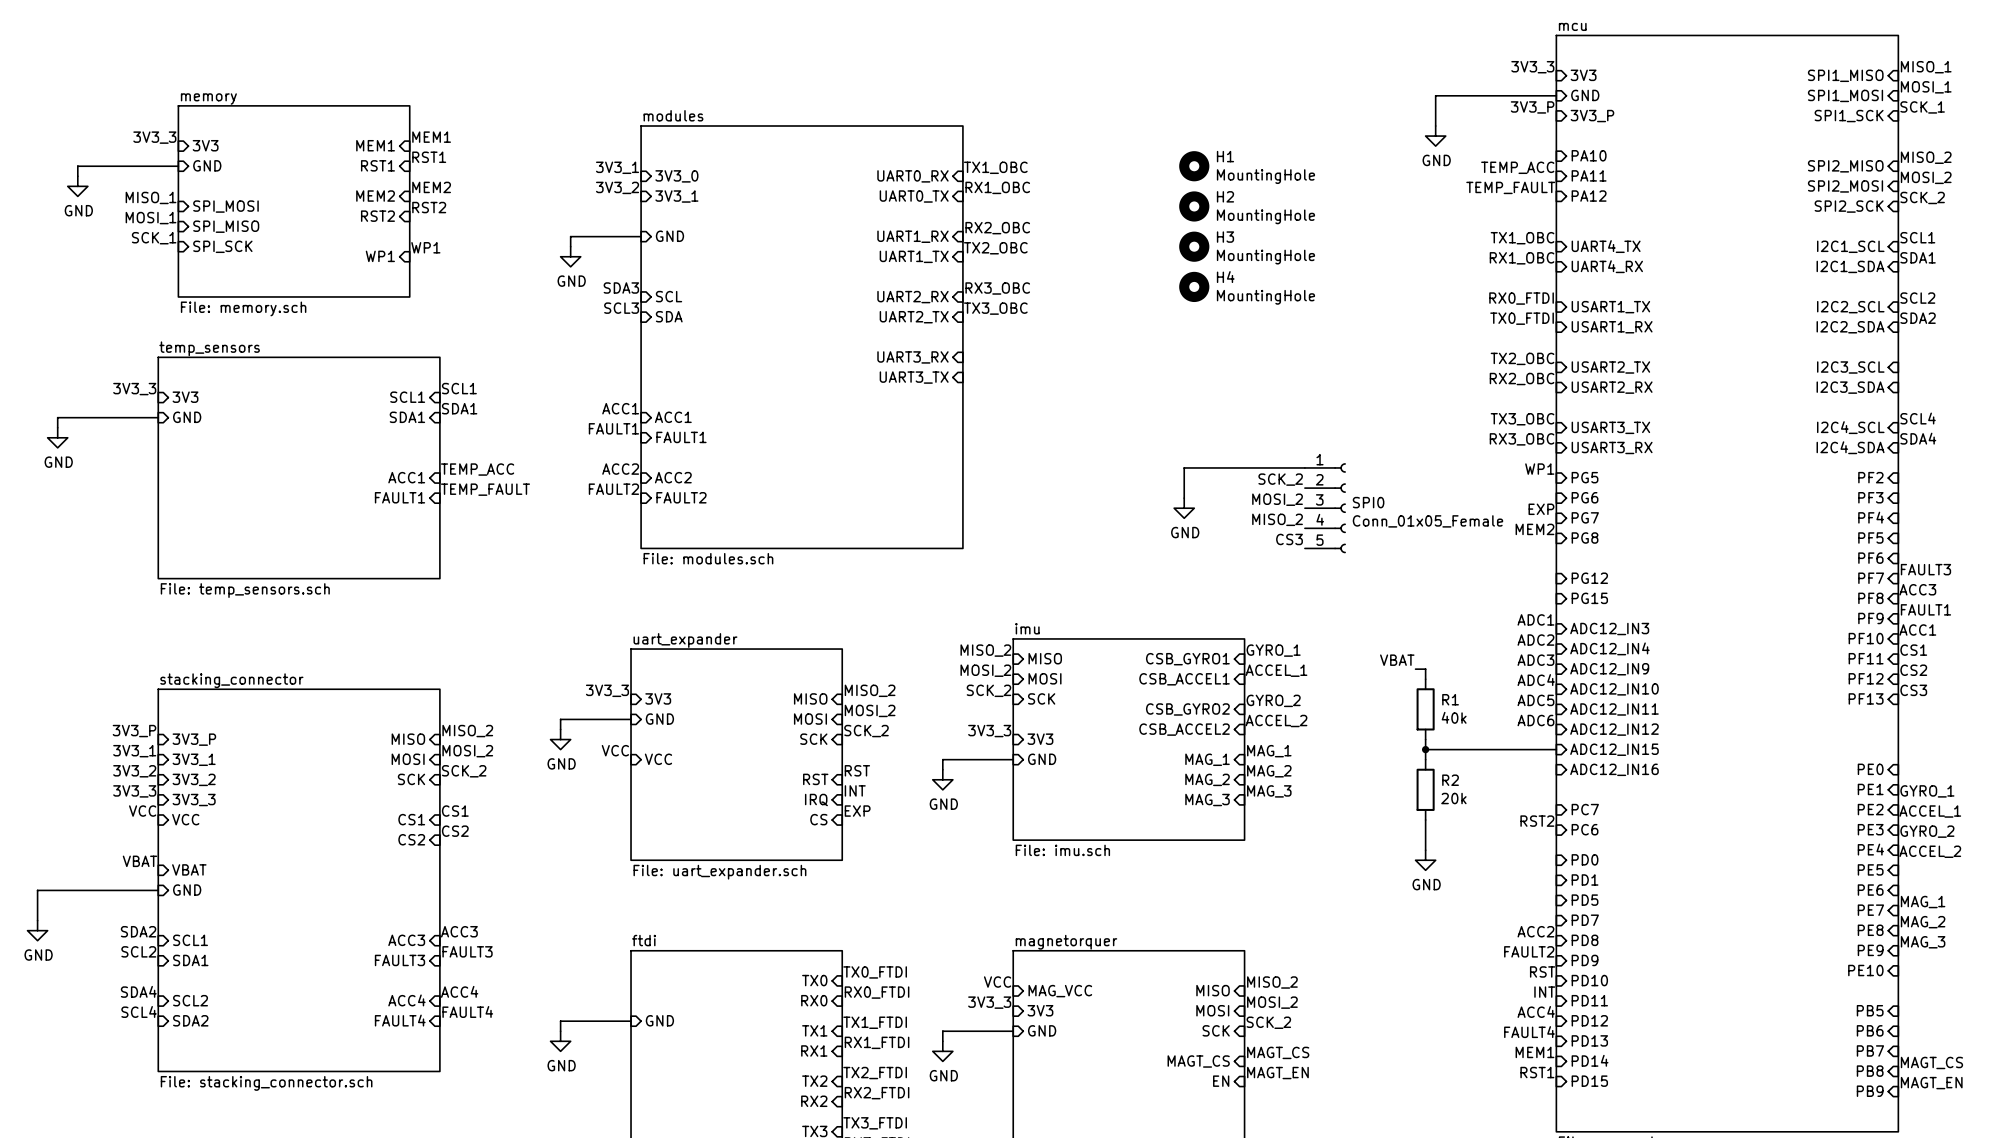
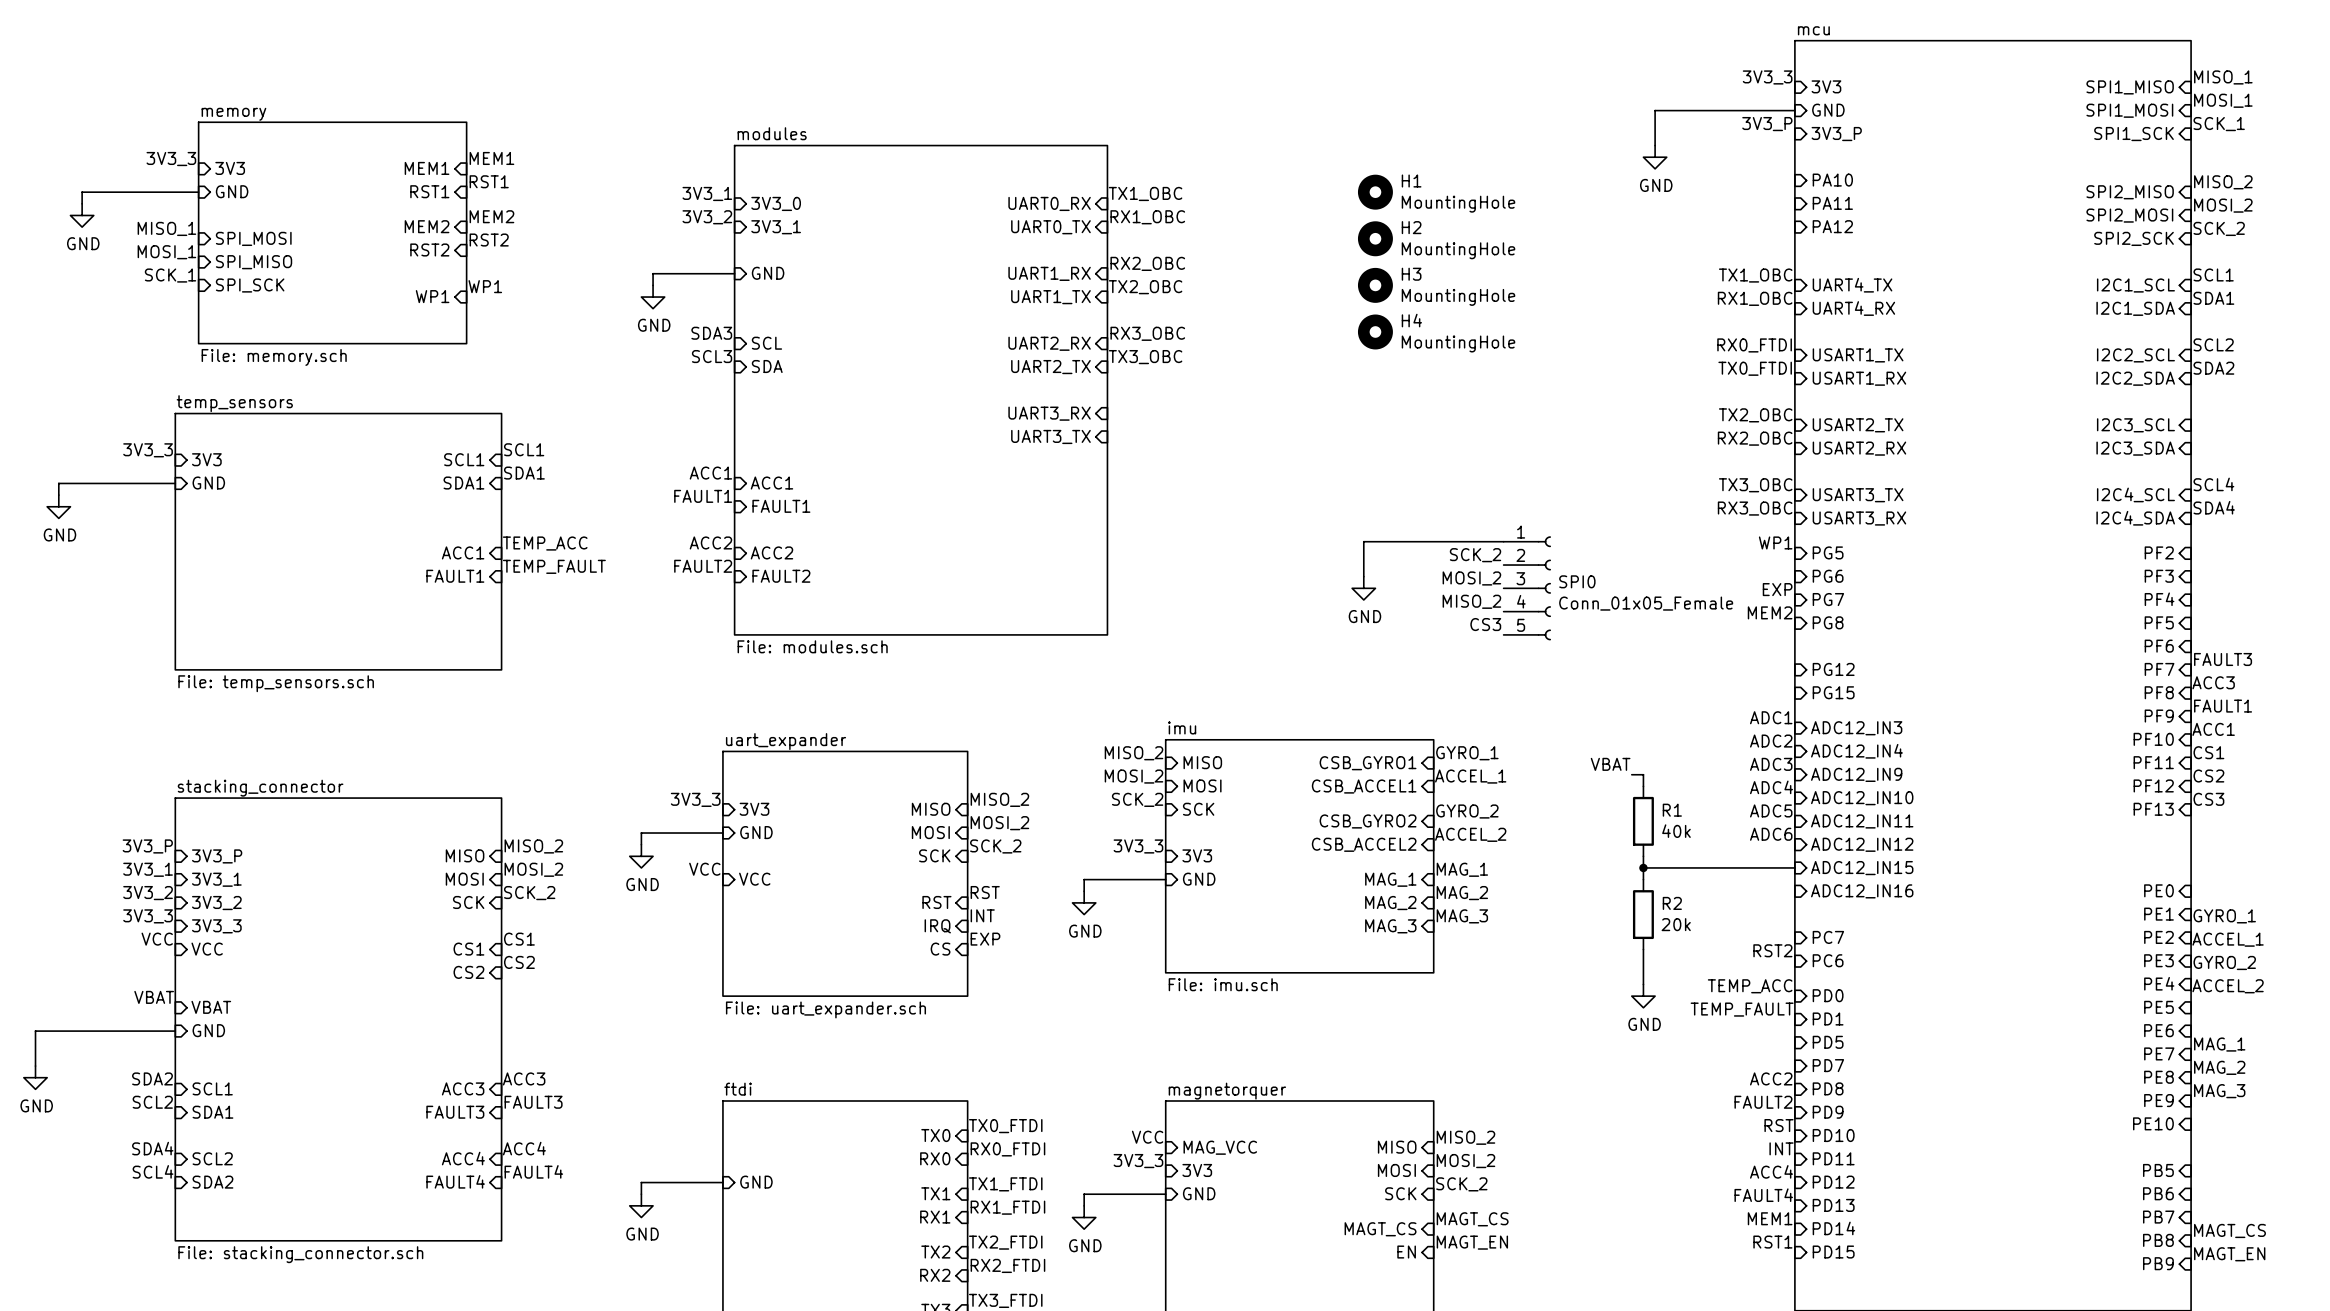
label: TEMP_ACC (1517, 167) -> none
label: TEMP_FAULT (1510, 187) -> none
label: none -> TEMP_ACC (1750, 986)
label: none -> TEMP_FAULT (1742, 1009)

